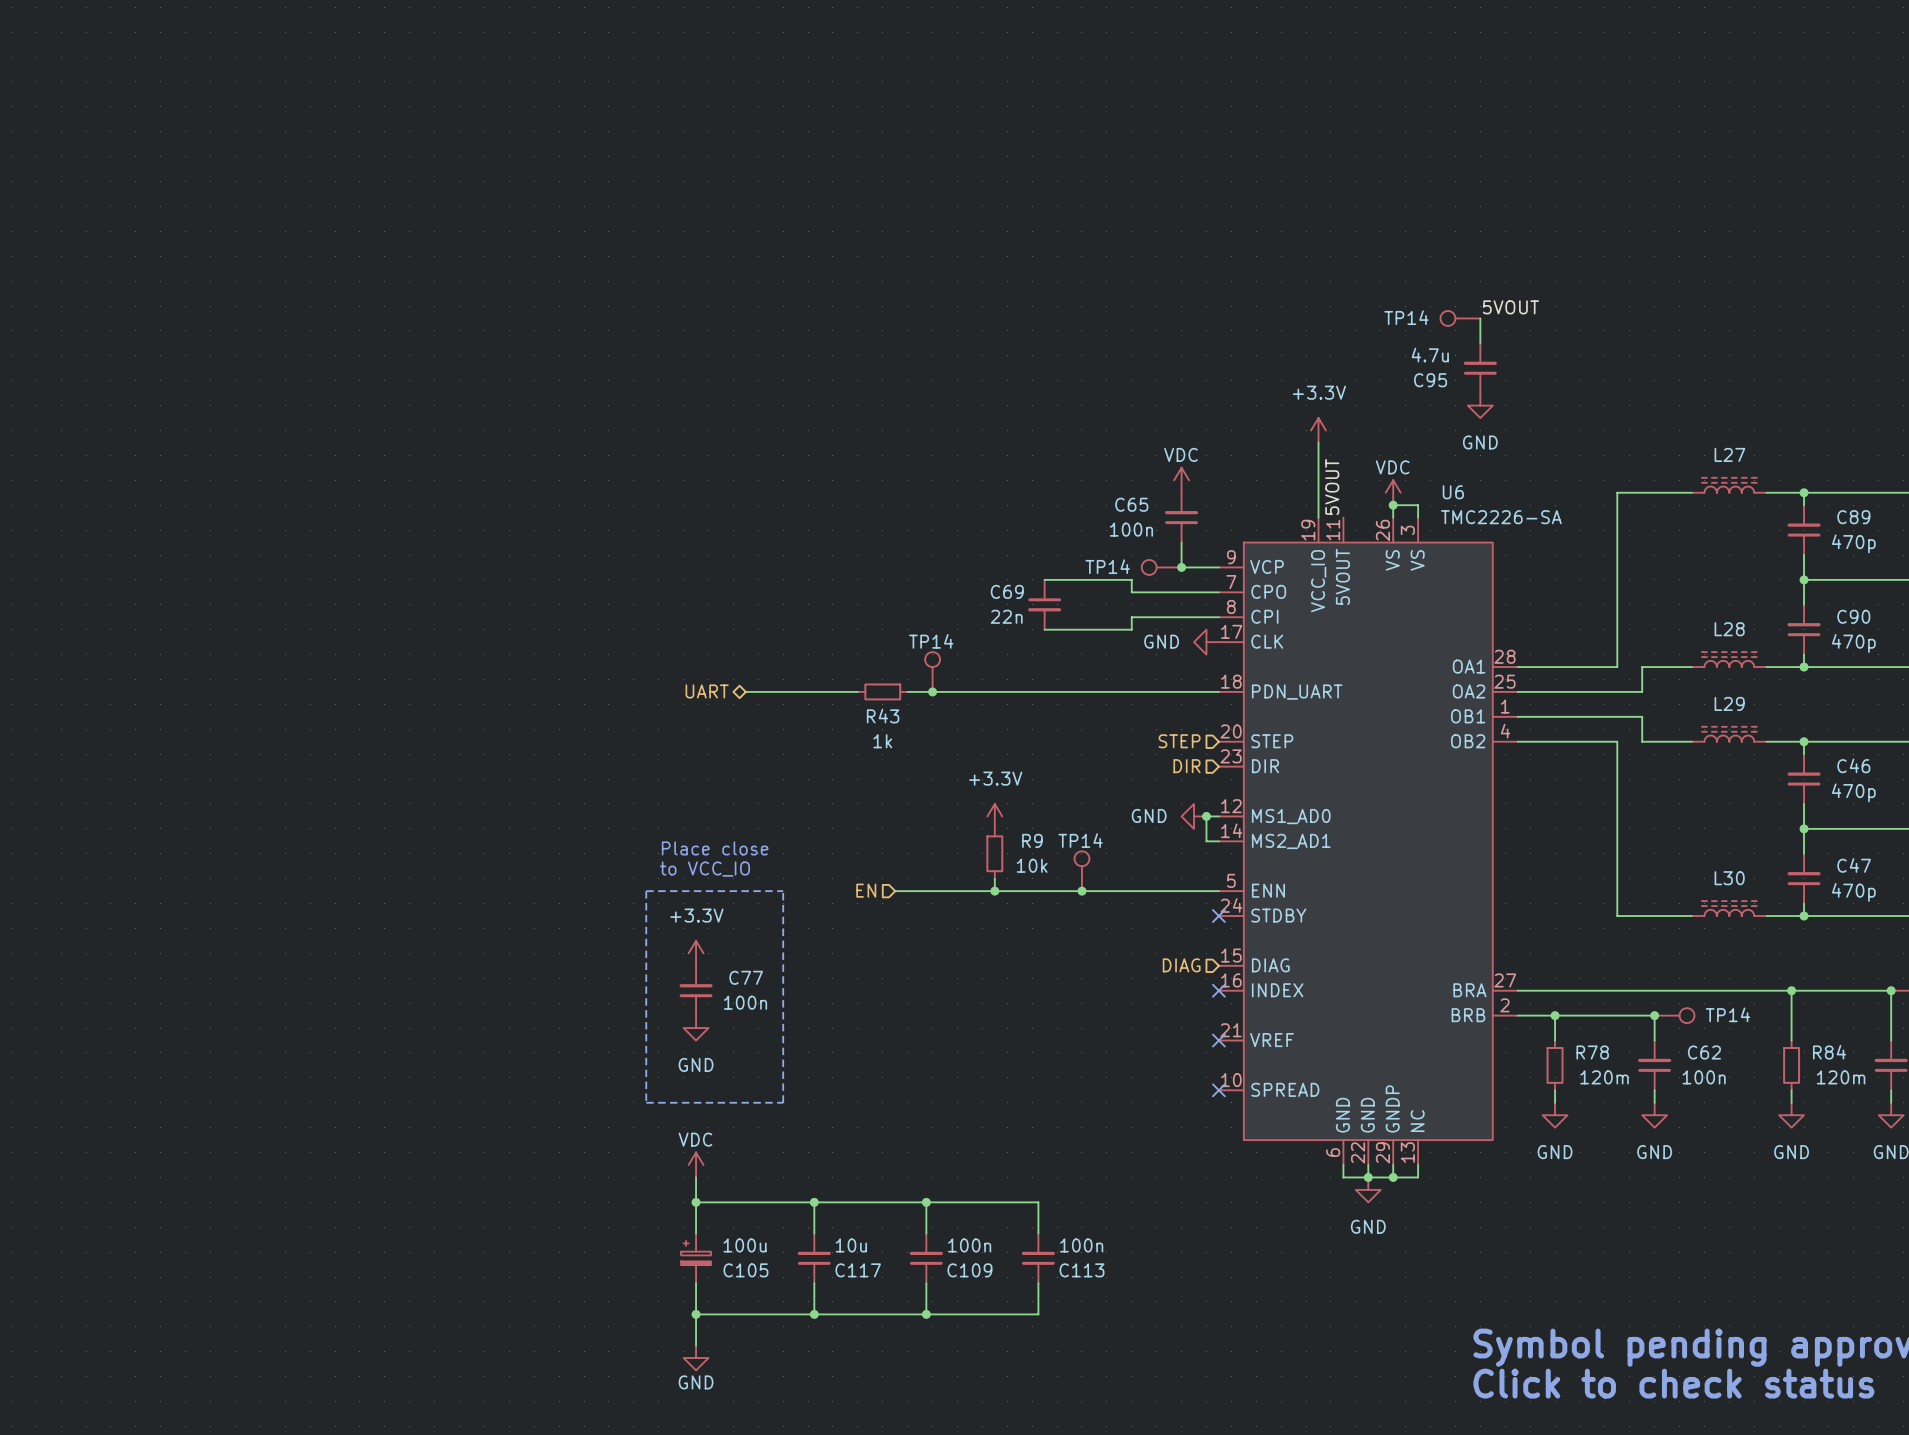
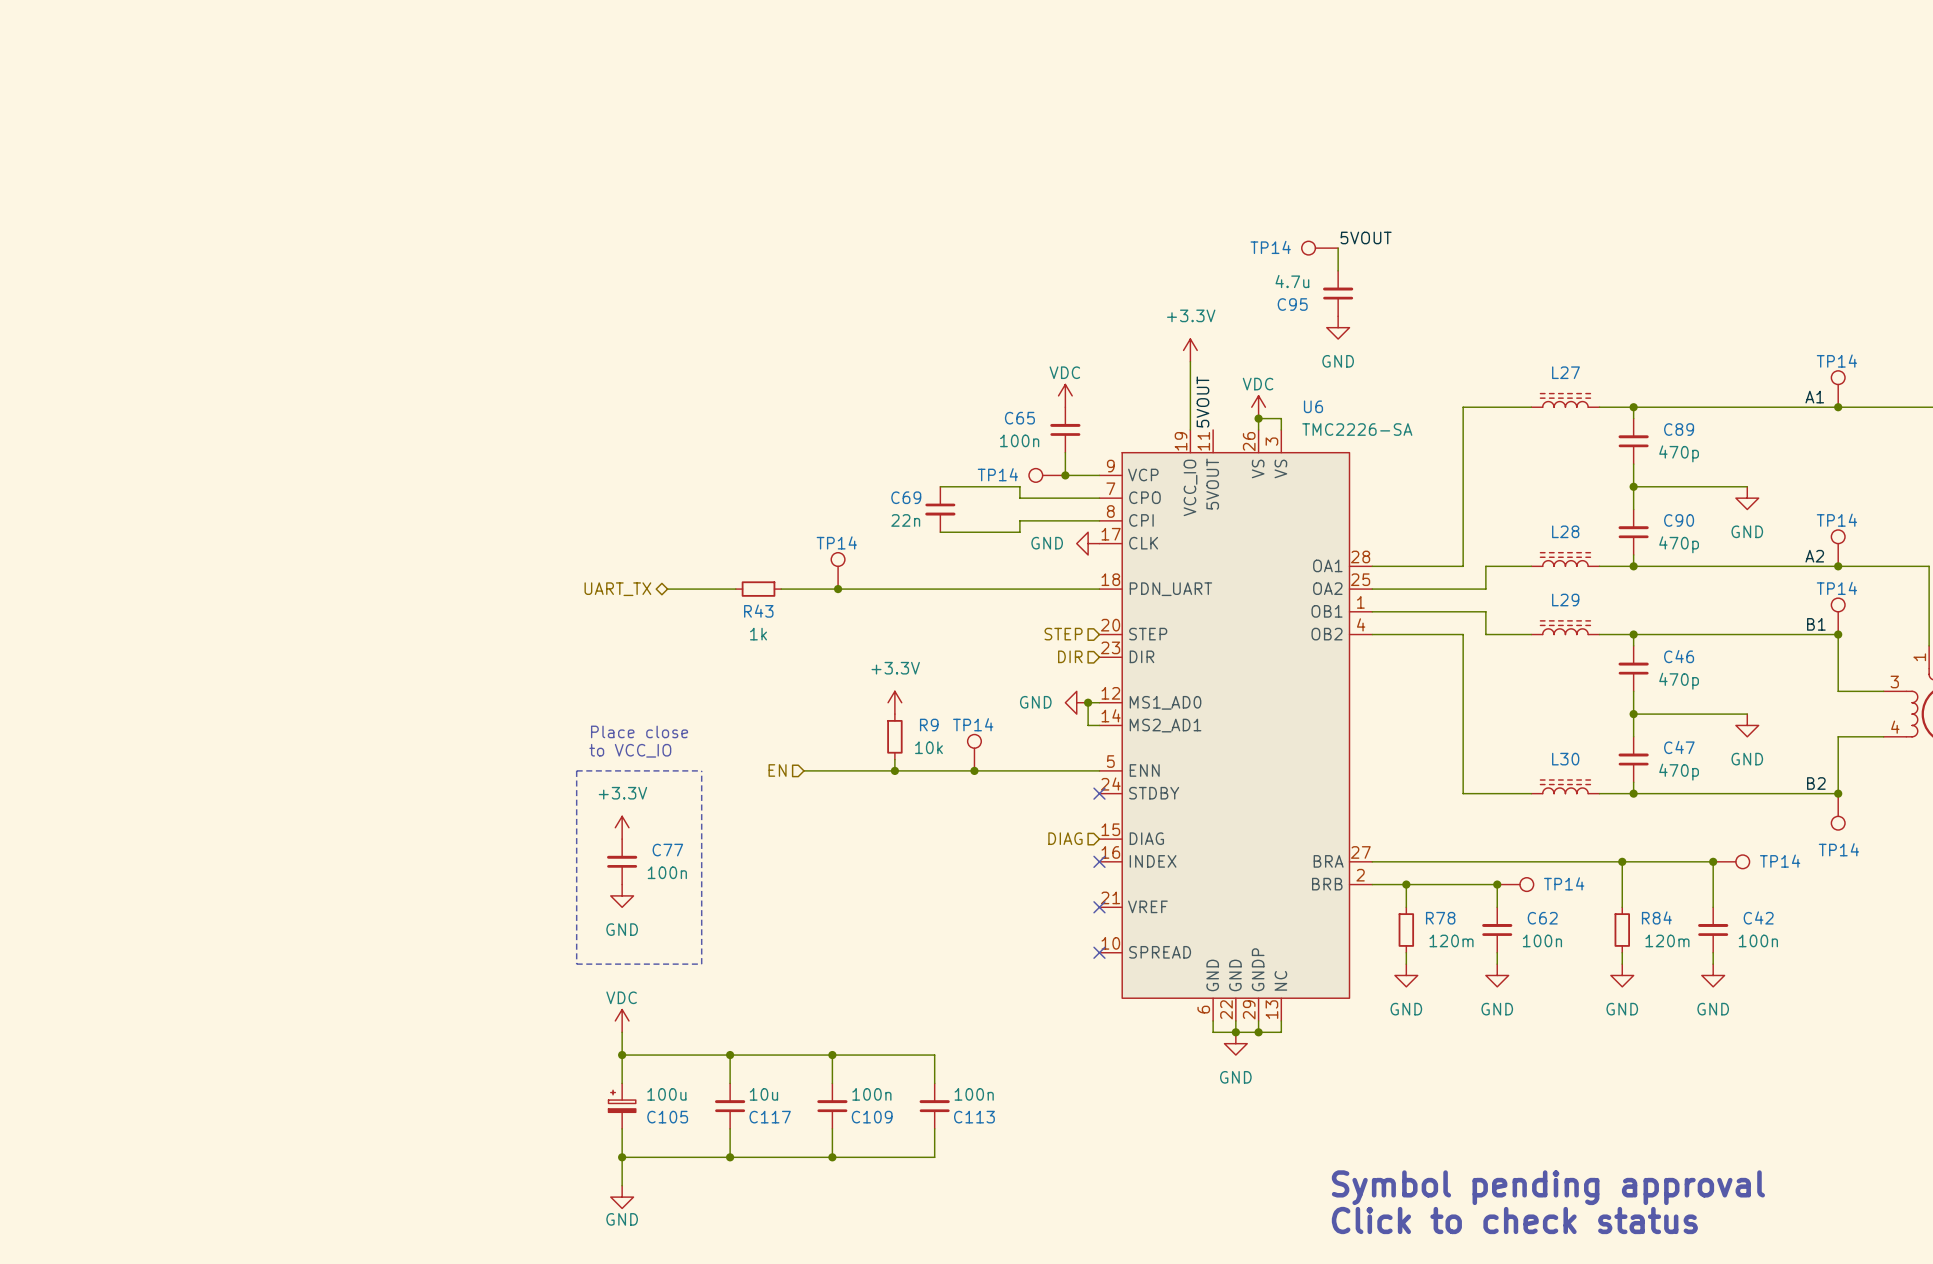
hierarchical label: UART (707, 691) -> UART_TX (617, 589)
wire: (820, 691) (857, 691) -> (781, 589) (815, 589)
R43 position: (882, 691) -> (758, 589)

